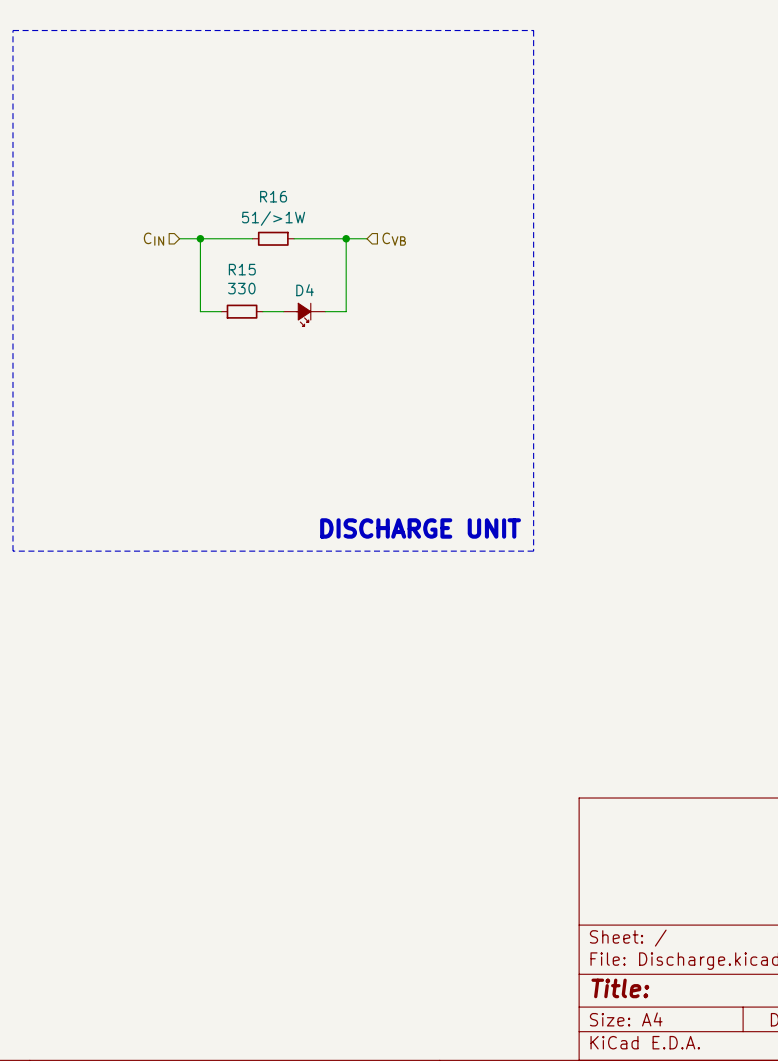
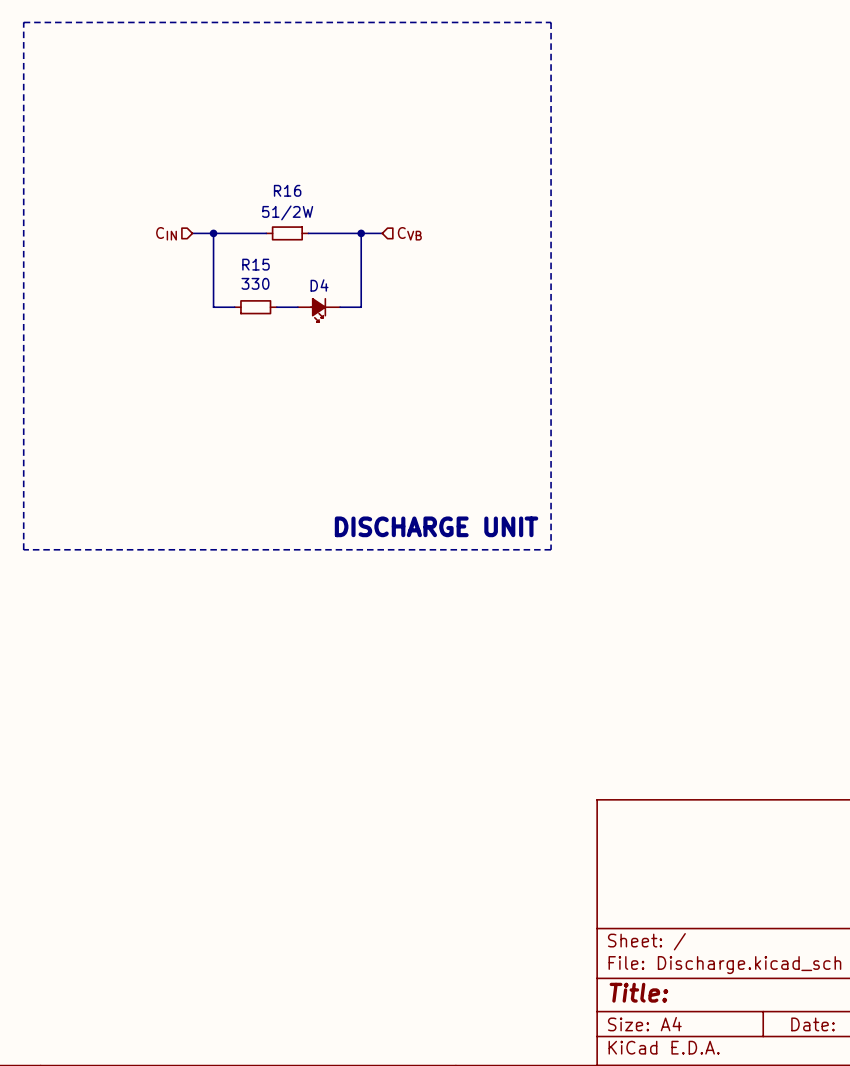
R16 value: 51/>1W (273, 218) -> 51/2W (287, 212)

